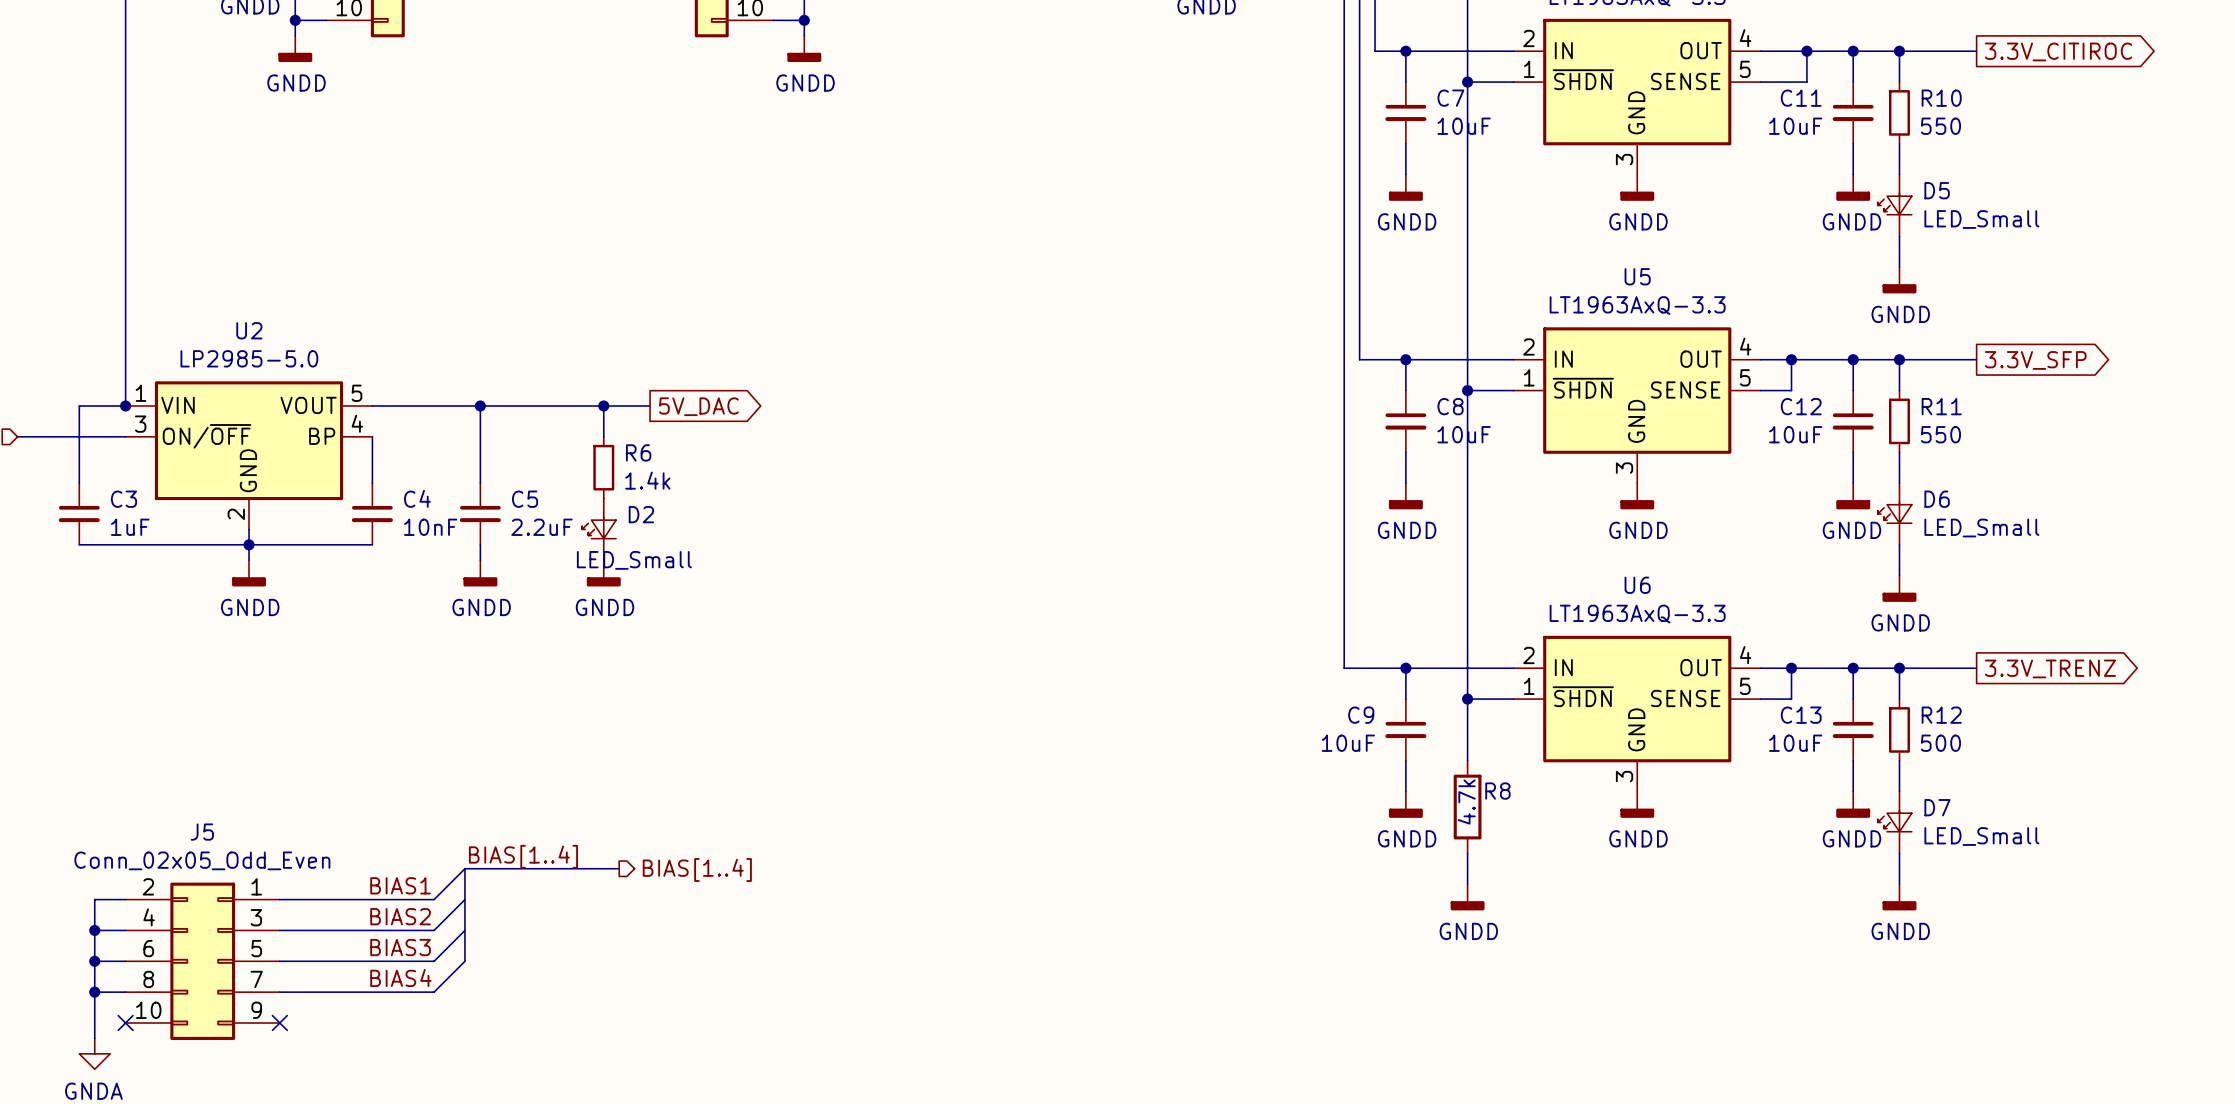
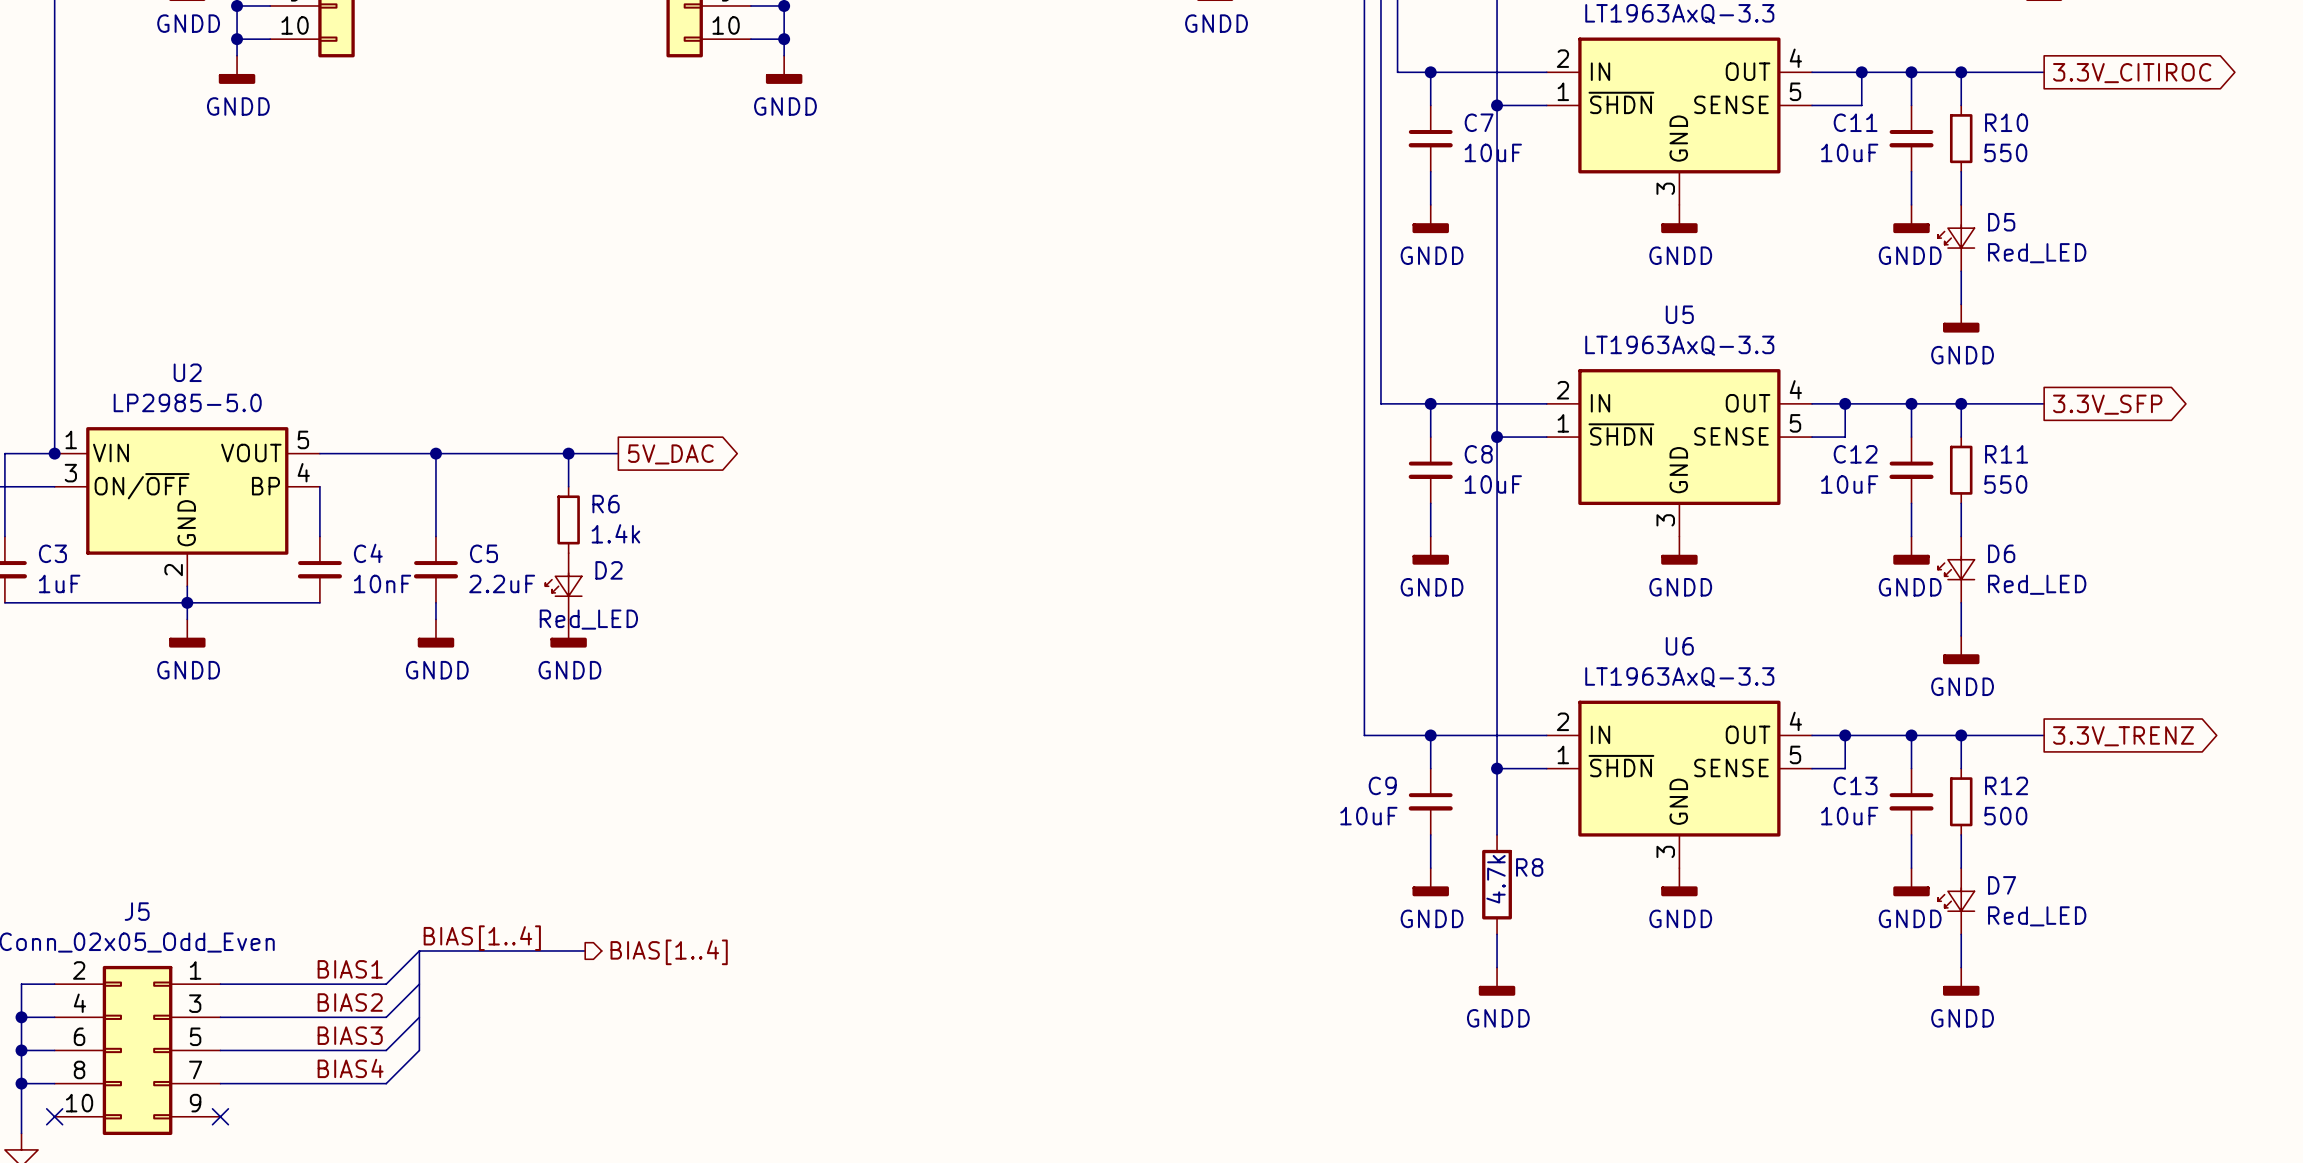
D5 value: LED_Small (1981, 219) -> Red_LED (2037, 253)
D6 value: LED_Small (1981, 528) -> Red_LED (2037, 584)
D2 value: LED_Small (634, 560) -> Red_LED (588, 619)
D7 value: LED_Small (1981, 836) -> Red_LED (2037, 916)

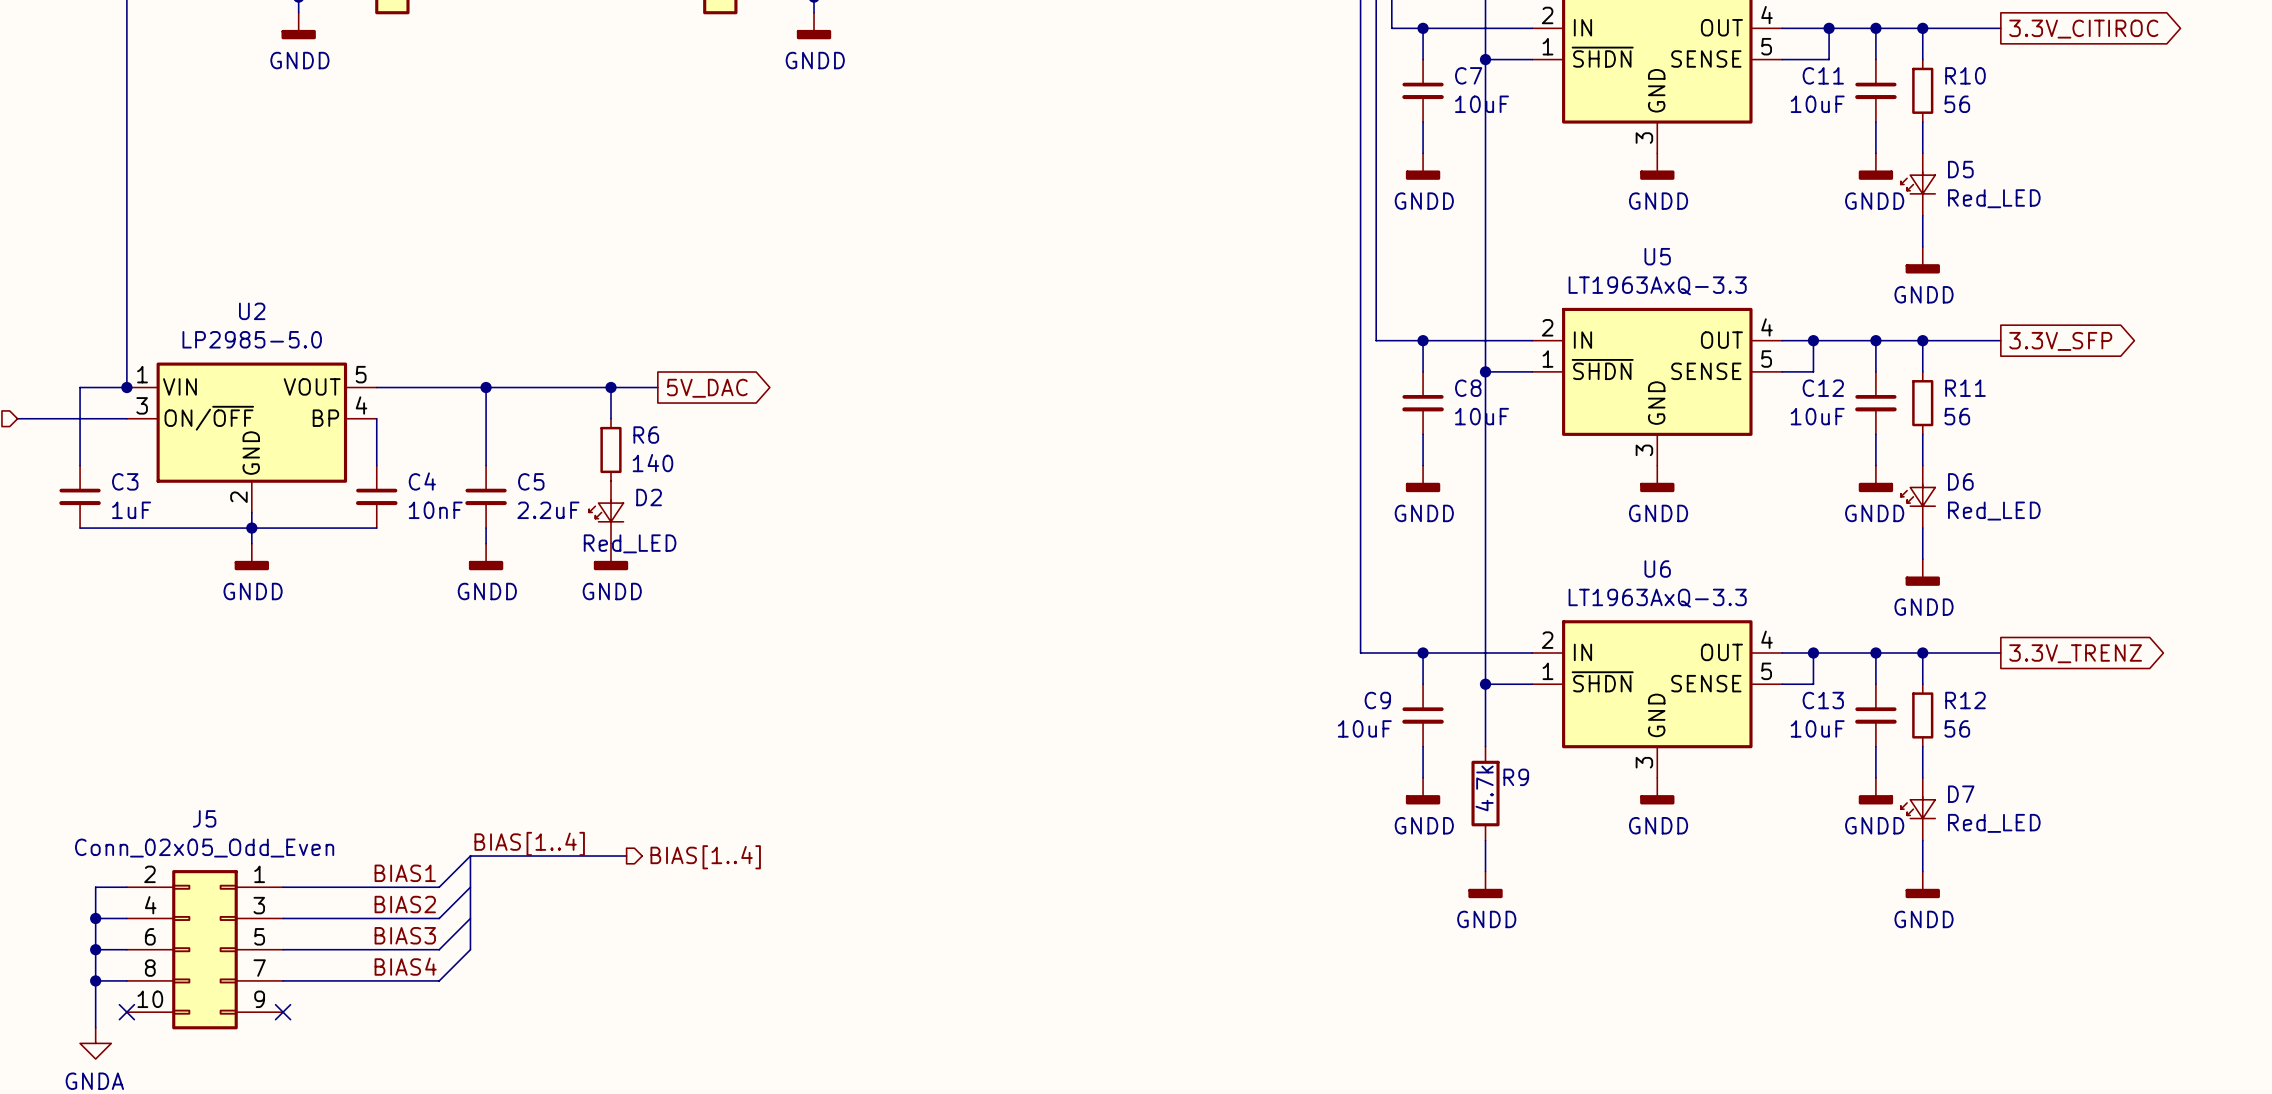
R10 value: 550 (2005, 152) -> 56 (1957, 104)
R11 value: 550 (2005, 484) -> 56 (1957, 416)
R6 value: 1.4k (615, 533) -> 140 (652, 463)
R12 value: 500 (2005, 816) -> 56 (1957, 728)
R8 name: R8 (1529, 867) -> R9 (1516, 777)

